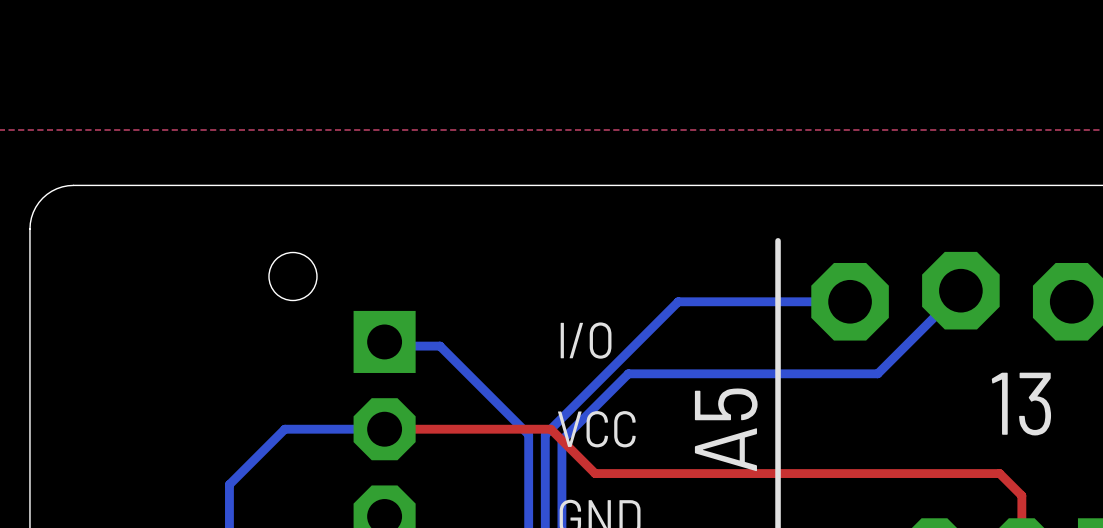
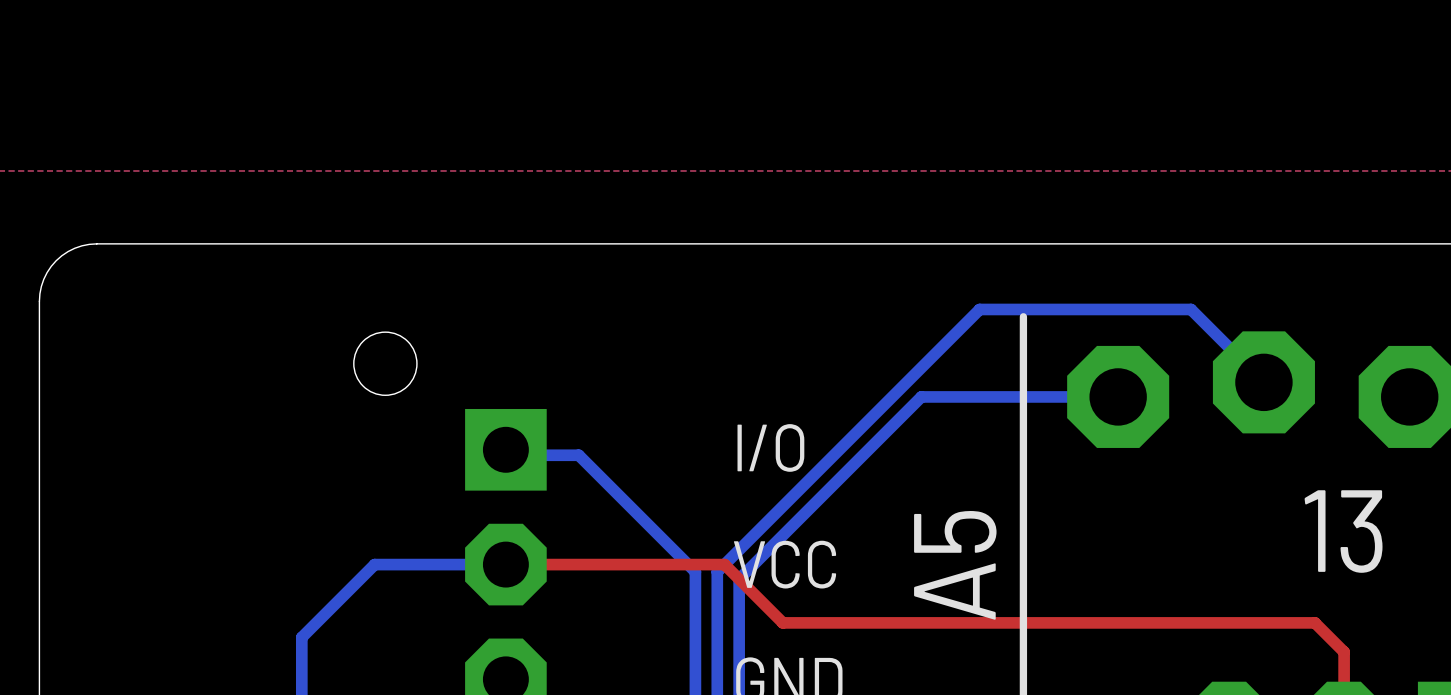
bottom track: (960, 290) (877, 373) (628, 373) -> (1263, 382) (1191, 309) (979, 309) (892, 396)
bottom track: (678, 301) (700, 301) -> (826, 491) (921, 396)

